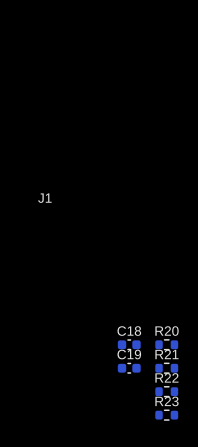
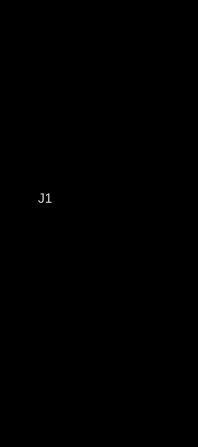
C18: (129, 344) -> none
R20: (166, 344) -> none
C19: (129, 368) -> none
R21: (166, 368) -> none
R22: (166, 391) -> none
R23: (166, 415) -> none

